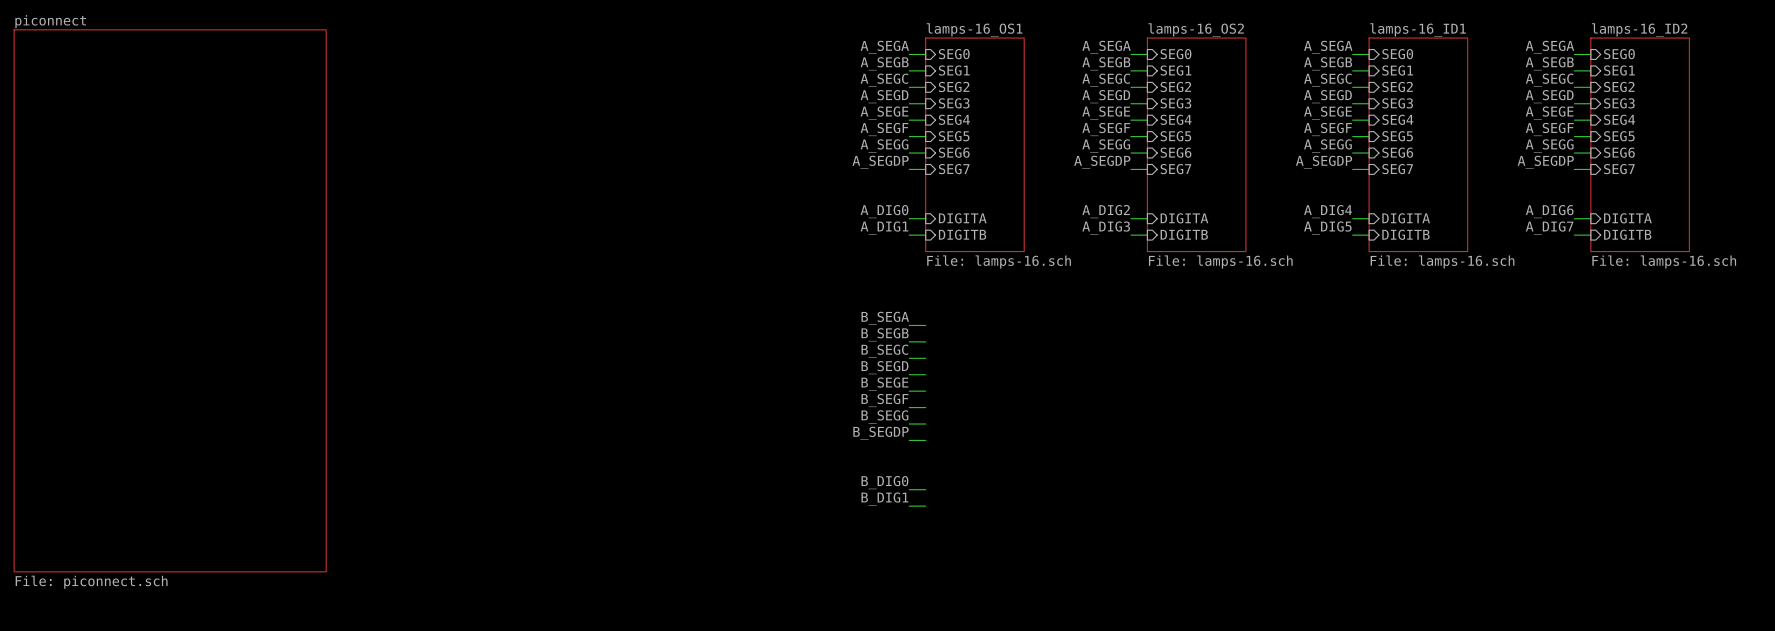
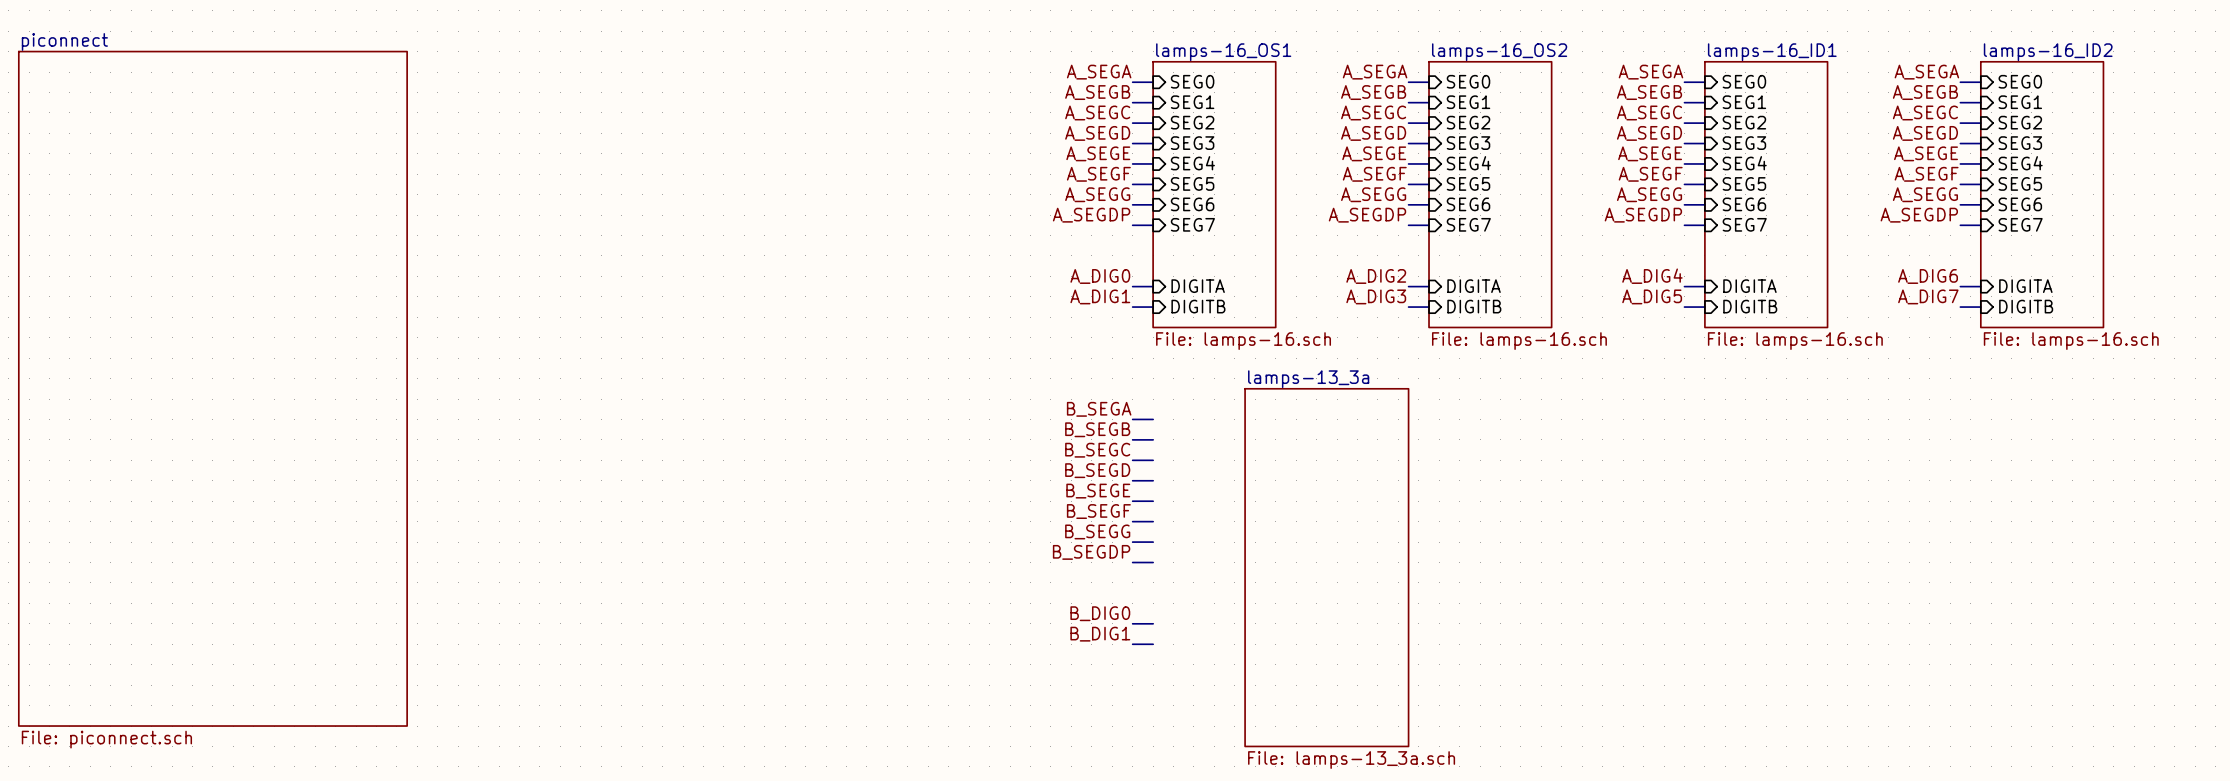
sheet lamps-13_3a: none -> File: lamps-13_3a.sch (1326, 567)

